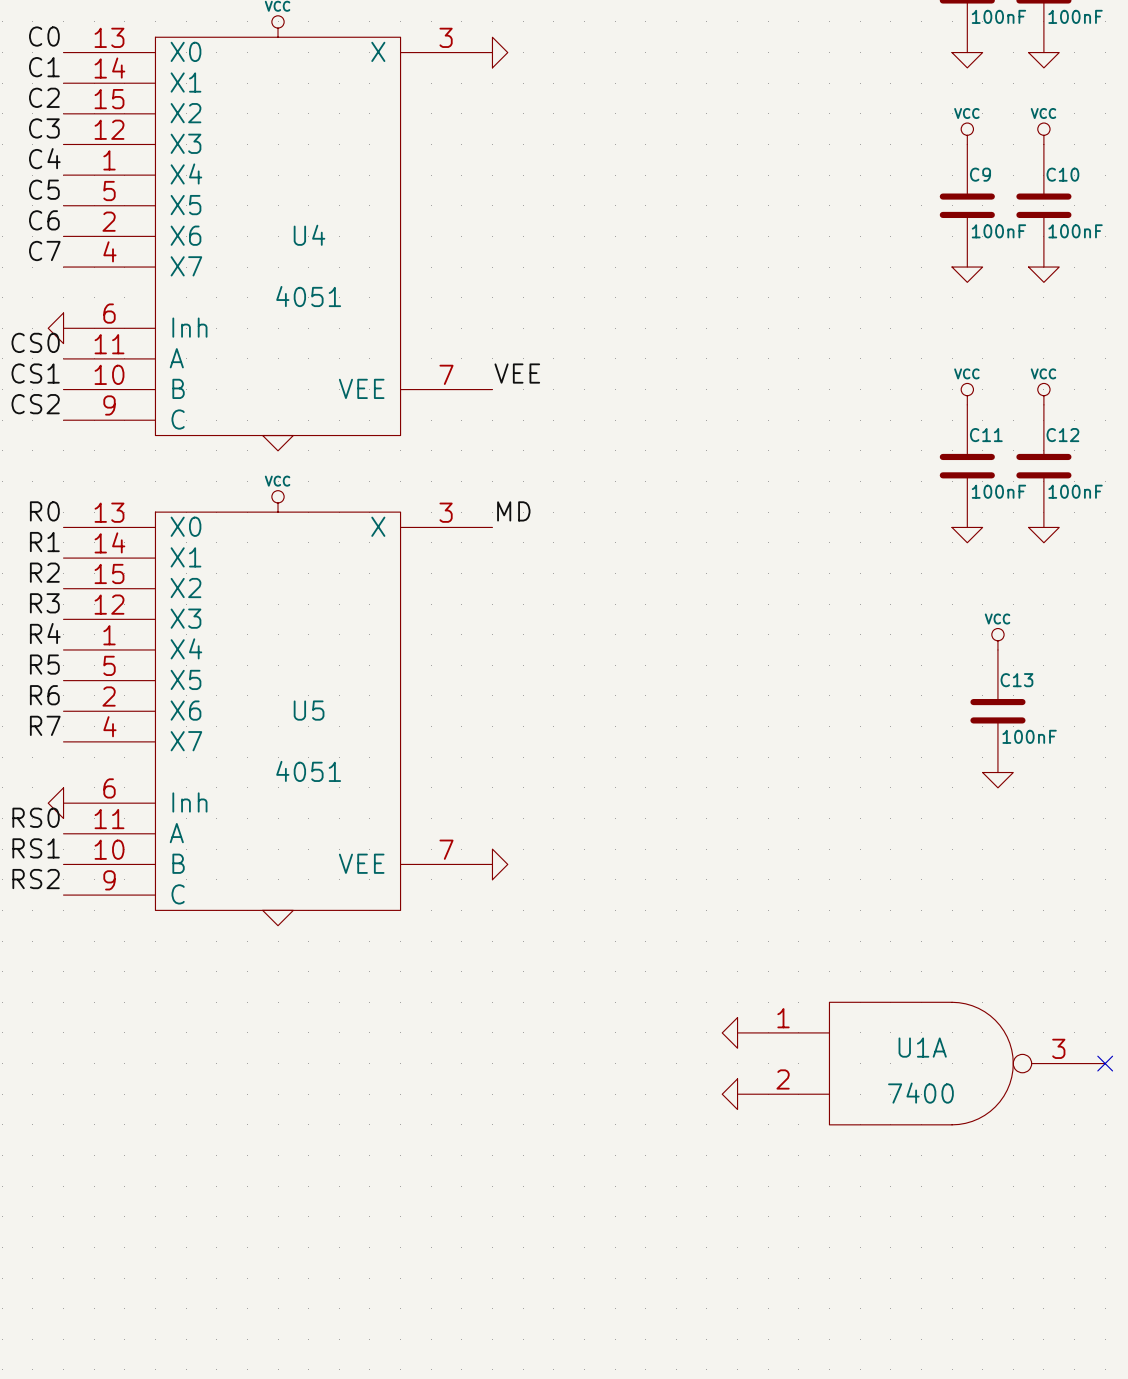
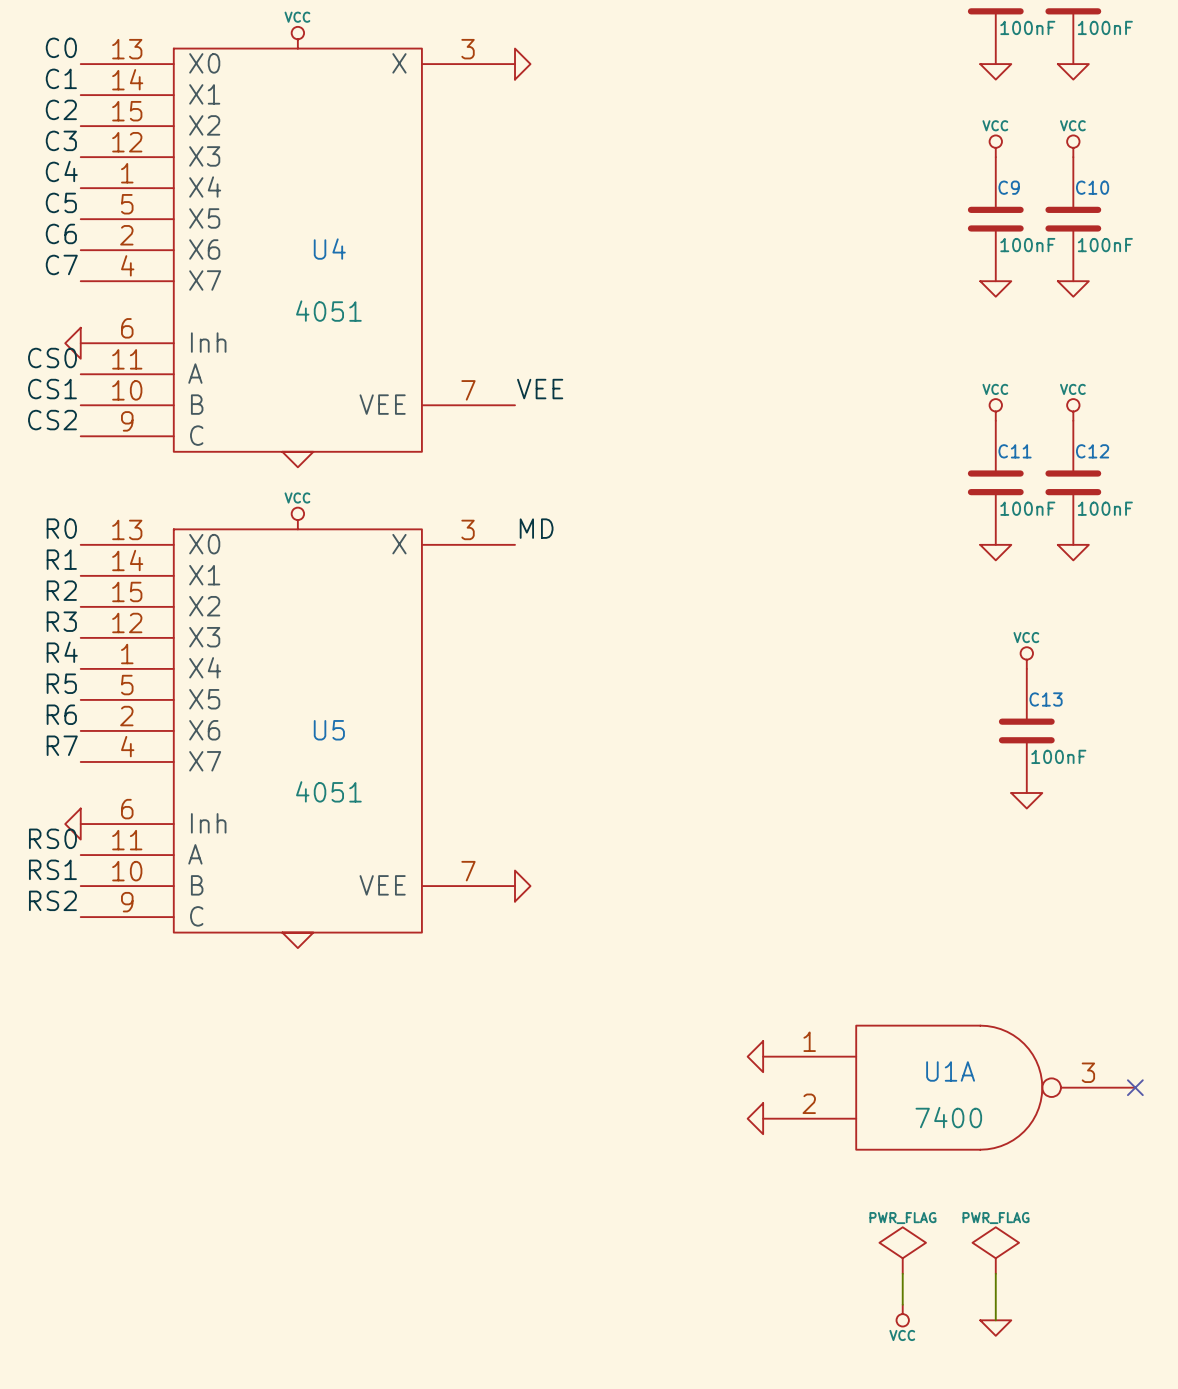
power symbol: none -> PWR_FLAG (902, 1250)
power symbol: none -> PWR_FLAG (995, 1250)
wire: none -> (902, 1273) (902, 1304)
wire: none -> (995, 1273) (995, 1320)
power symbol: none -> VCC (902, 1315)
power symbol: none -> (995, 1328)

